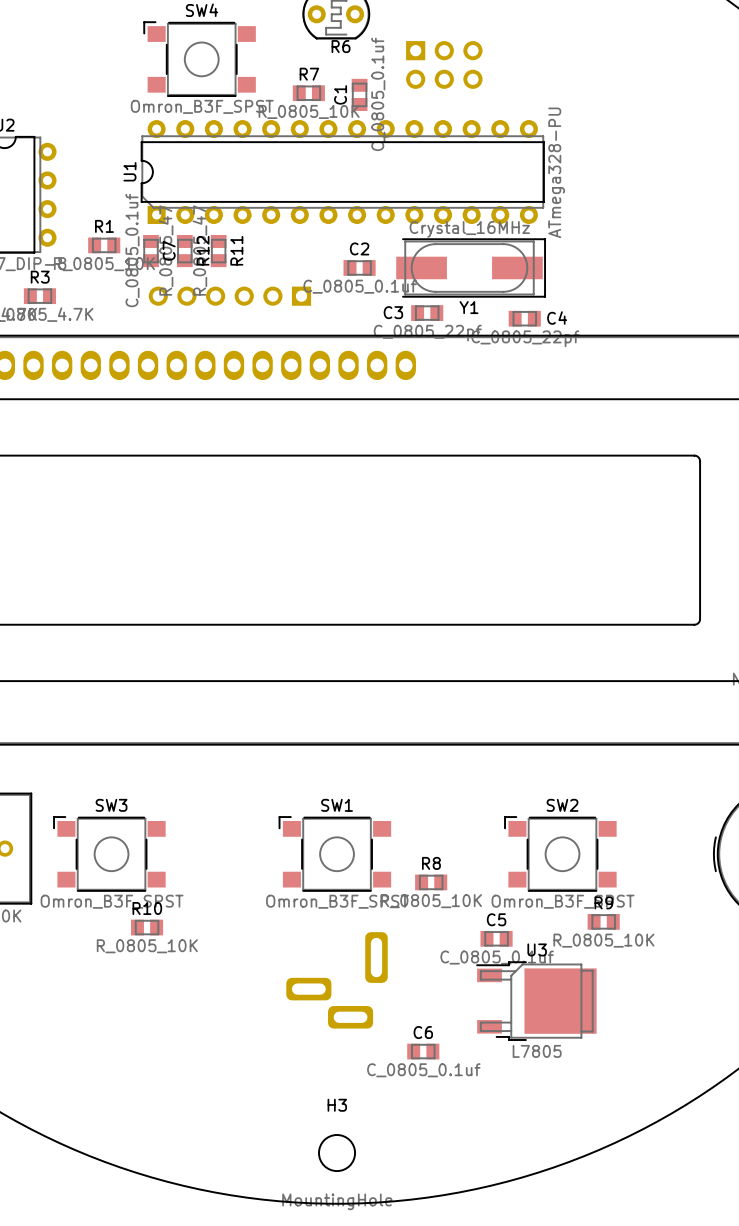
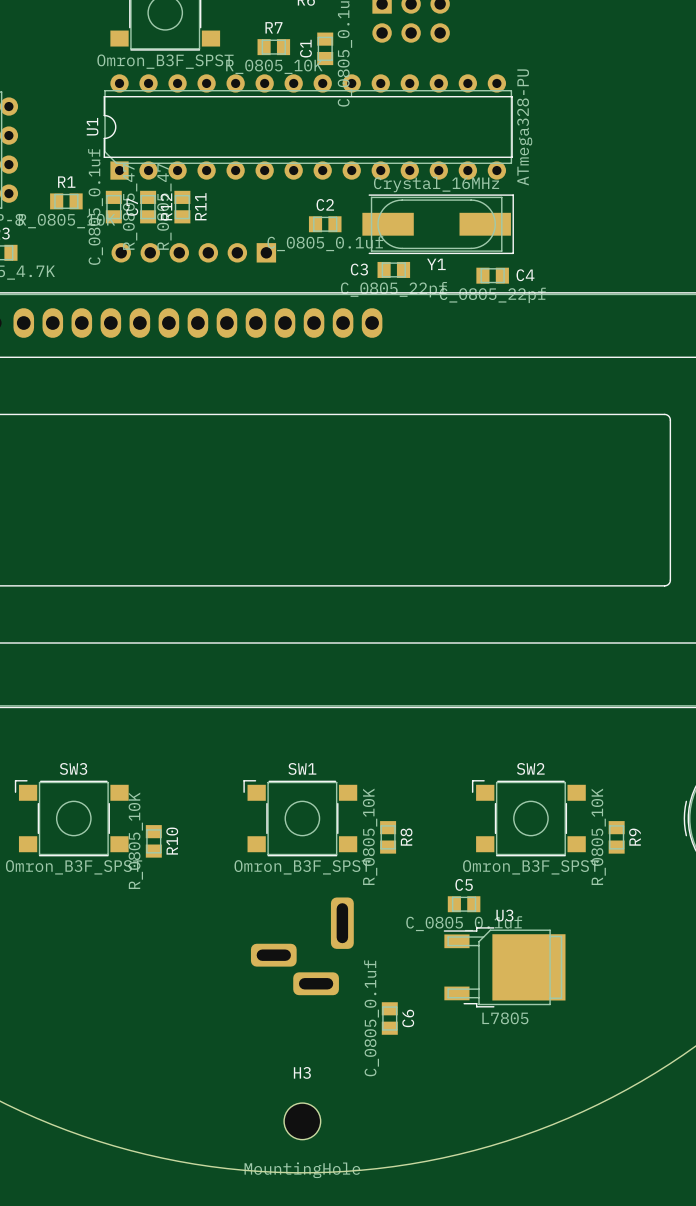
R8 rotation: 0° (431, 882) -> 90° clockwise (388, 837)
R9 rotation: 0° (603, 921) -> 90° clockwise (616, 837)
R9 position: (603, 921) -> (616, 837)
R10 rotation: 0° (147, 927) -> 90° clockwise (153, 841)
R10 position: (147, 927) -> (153, 841)
C6 rotation: 0° (423, 1051) -> 90° clockwise (389, 1018)

